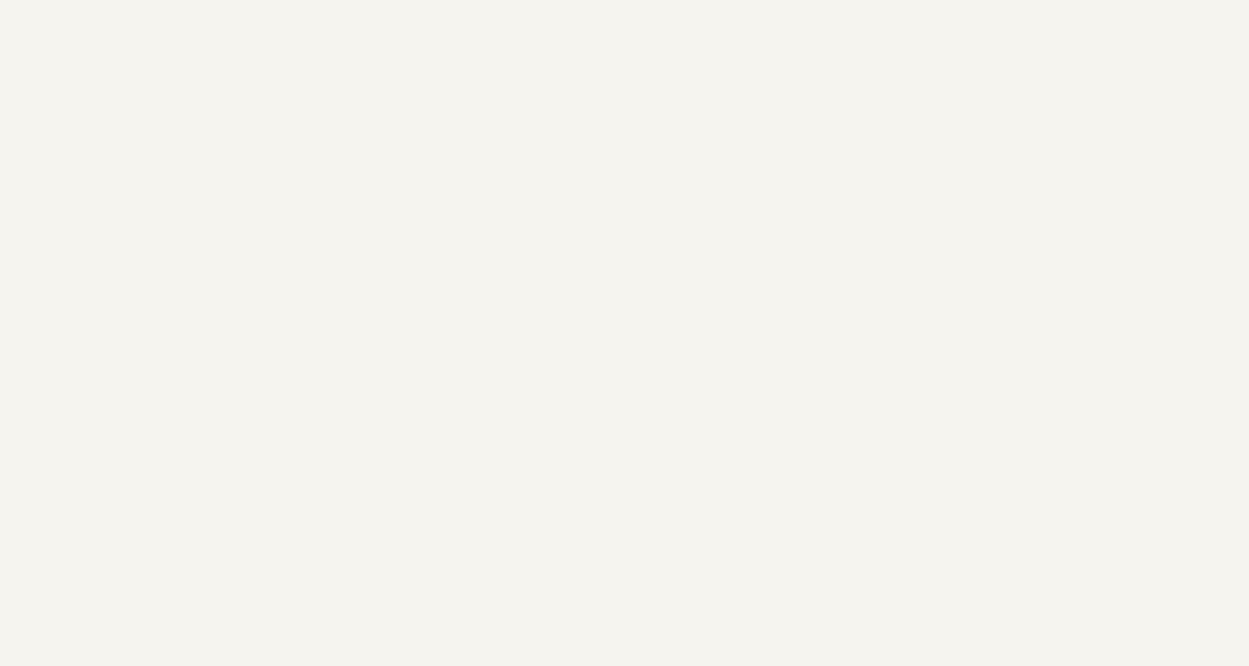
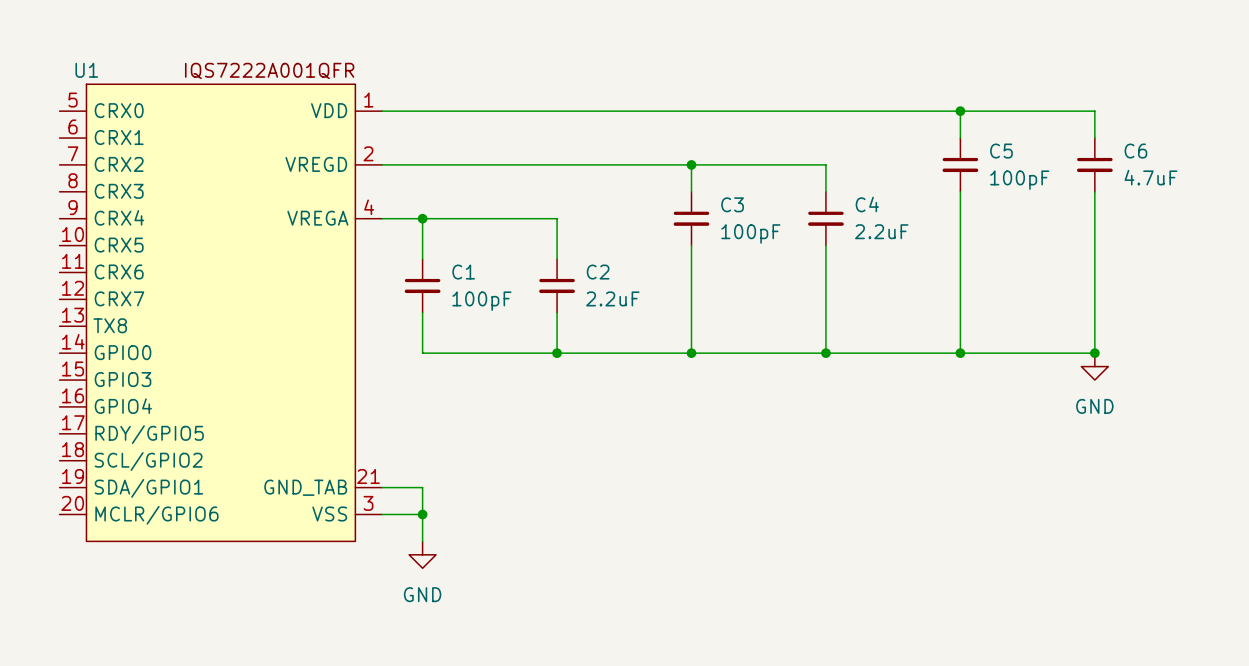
wire: none -> (382, 111) (1094, 111) (1094, 138)
wire: none -> (960, 111) (960, 138)
junction: none -> (960, 111)
wire: none -> (382, 164) (825, 164) (825, 191)
wire: none -> (691, 164) (691, 191)
junction: none -> (691, 164)
C5: none -> 100pF (960, 164)
C6: none -> 4.7uF (1094, 164)
wire: none -> (960, 191) (960, 353)
wire: none -> (1094, 191) (1094, 353) (422, 353) (422, 312)
wire: none -> (382, 218) (557, 218) (557, 259)
wire: none -> (422, 218) (422, 259)
junction: none -> (422, 218)
C3: none -> 100pF (691, 218)
C4: none -> 2.2uF (825, 218)
wire: none -> (691, 245) (691, 353)
wire: none -> (825, 245) (825, 353)
C1: none -> 100pF (422, 285)
C2: none -> 2.2uF (557, 285)
U1: none -> (220, 312)
wire: none -> (557, 312) (557, 353)
junction: none -> (557, 353)
junction: none -> (691, 353)
junction: none -> (825, 353)
junction: none -> (960, 353)
junction: none -> (1094, 353)
power symbol: none -> GND (1094, 366)
wire: none -> (382, 487) (422, 487) (422, 541)
wire: none -> (382, 514) (422, 514)
junction: none -> (422, 514)
power symbol: none -> GND (422, 554)

